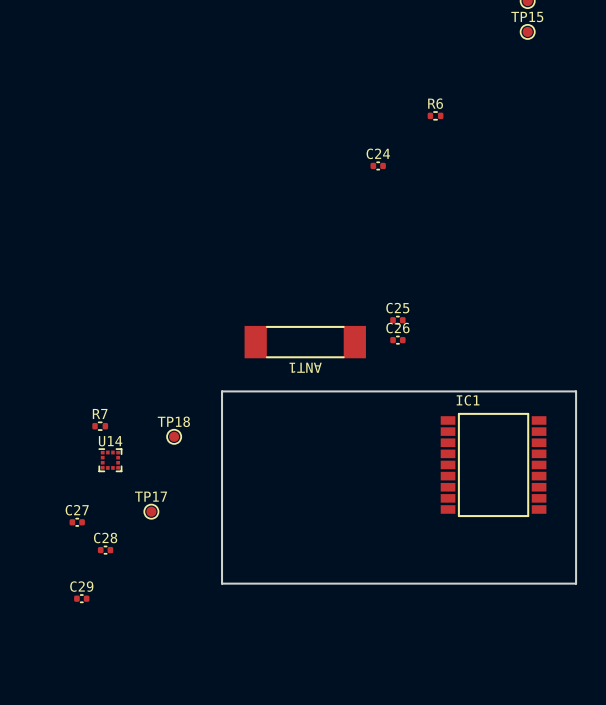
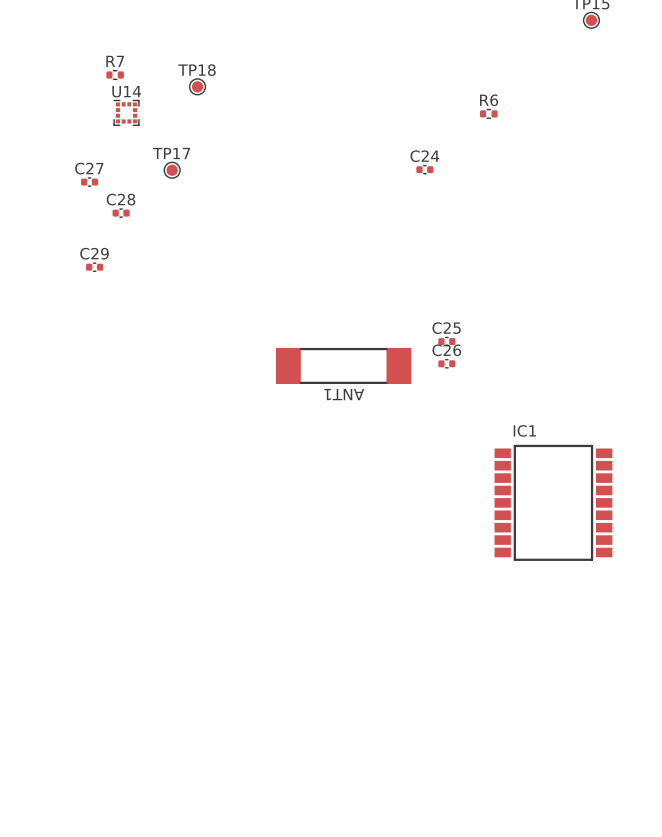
board edge: (222, 391) (576, 391) (576, 583) (222, 583) (222, 391) -> none
R7 position: (100, 426) -> (115, 75)
TP18 position: (174, 436) -> (197, 86)
U14 position: (110, 460) -> (126, 112)
TP17 position: (151, 511) -> (172, 170)
C27 position: (77, 522) -> (89, 182)
C28 position: (105, 550) -> (121, 213)
C29 position: (81, 598) -> (94, 267)

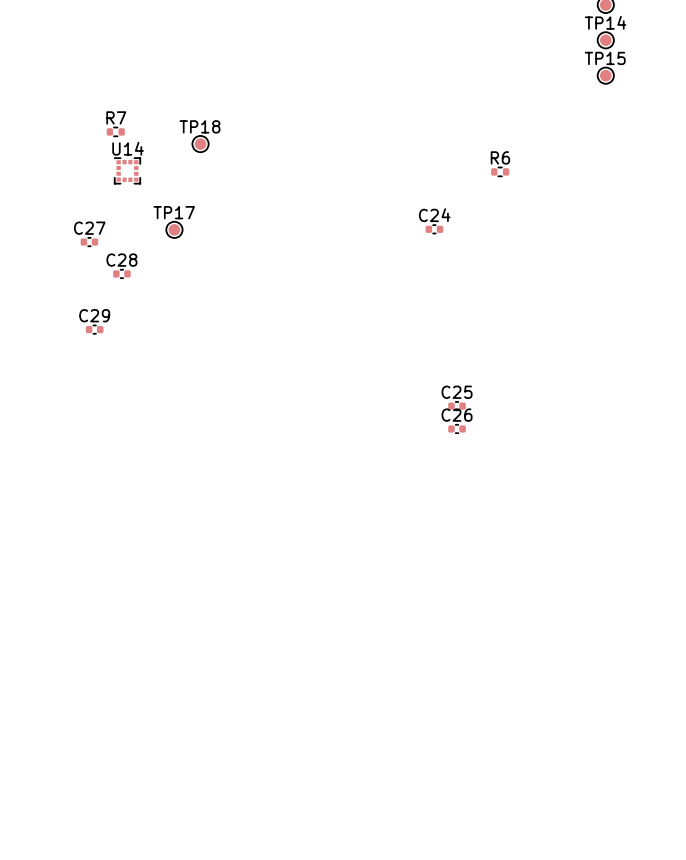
ANT1: (343, 365) -> none
IC1: (553, 502) -> none

